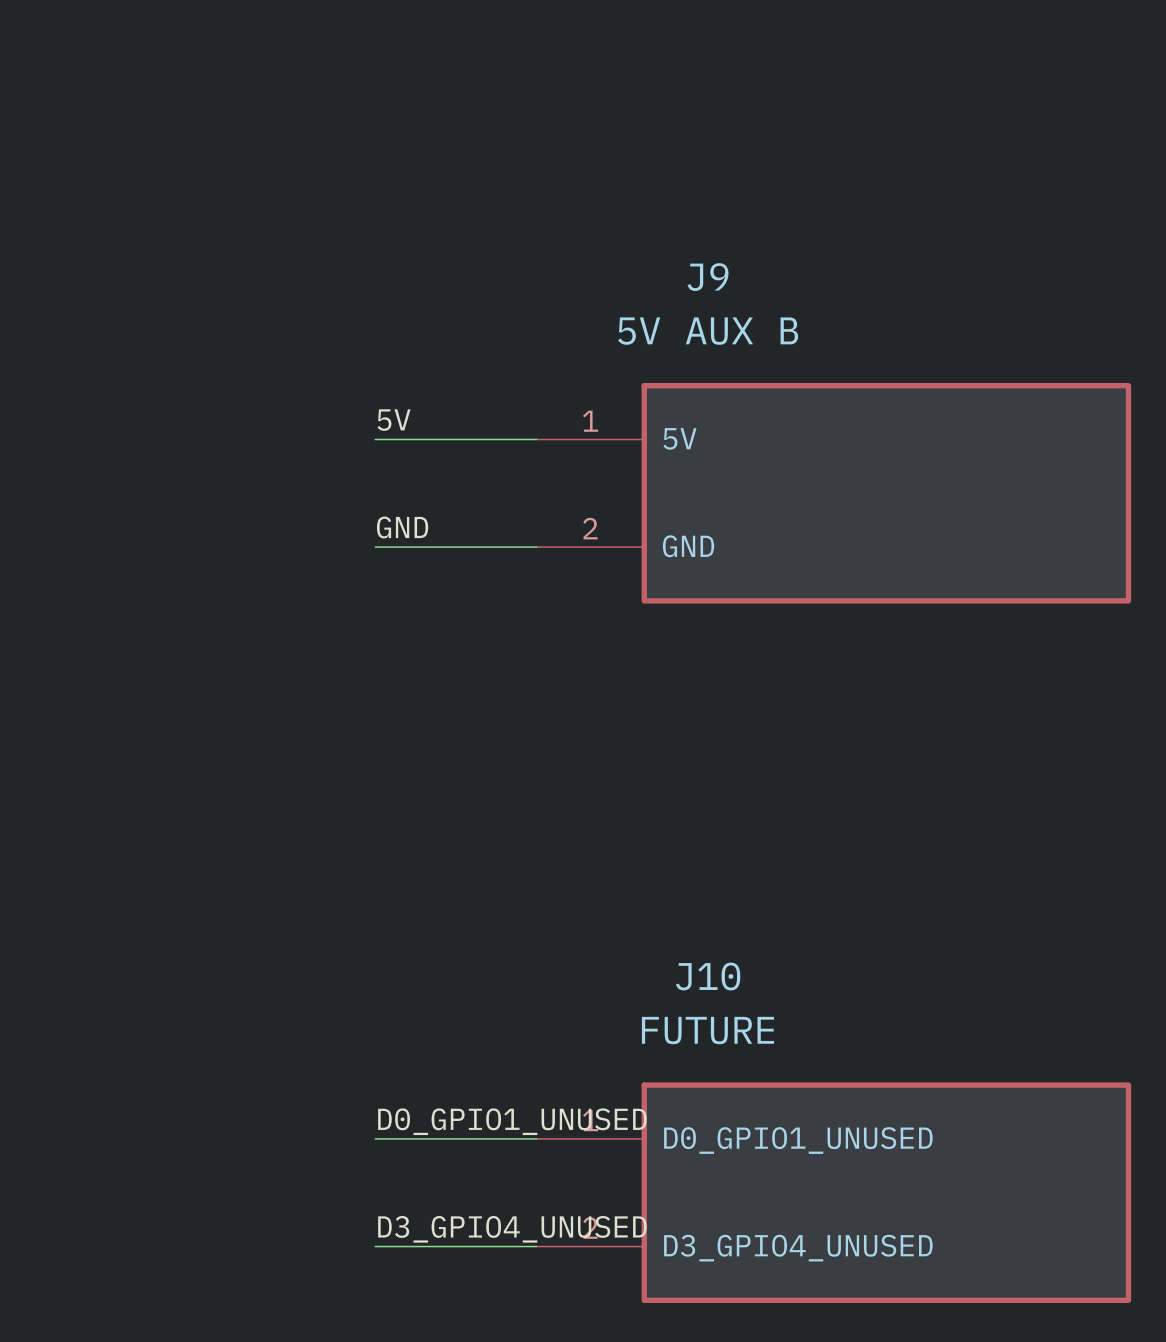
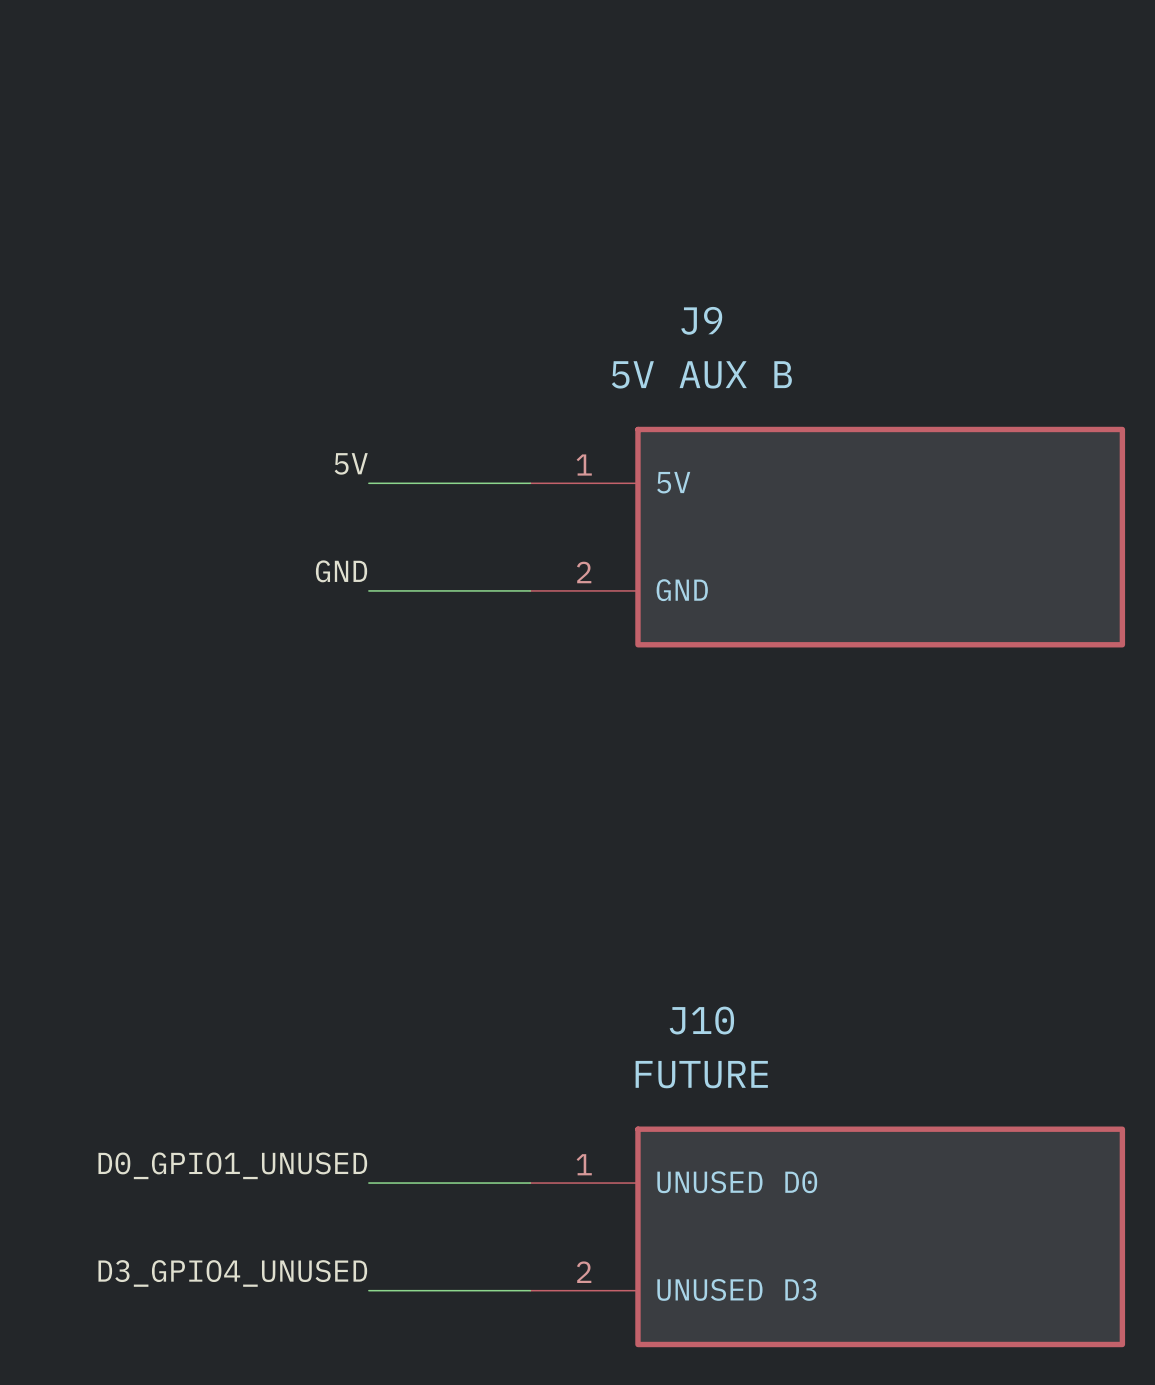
label position: 5V (394, 420) -> 5V (351, 463)
label position: GND (402, 527) -> GND (341, 571)
label position: D0_GPIO1_UNUSED (512, 1121) -> D0_GPIO1_UNUSED (232, 1165)
J10 pin name: D0_GPIO1_UNUSED (798, 1140) -> UNUSED D0 (737, 1182)
label position: D3_GPIO4_UNUSED (512, 1229) -> D3_GPIO4_UNUSED (232, 1273)
J10 pin name: D3_GPIO4_UNUSED (798, 1248) -> UNUSED D3 (736, 1289)

